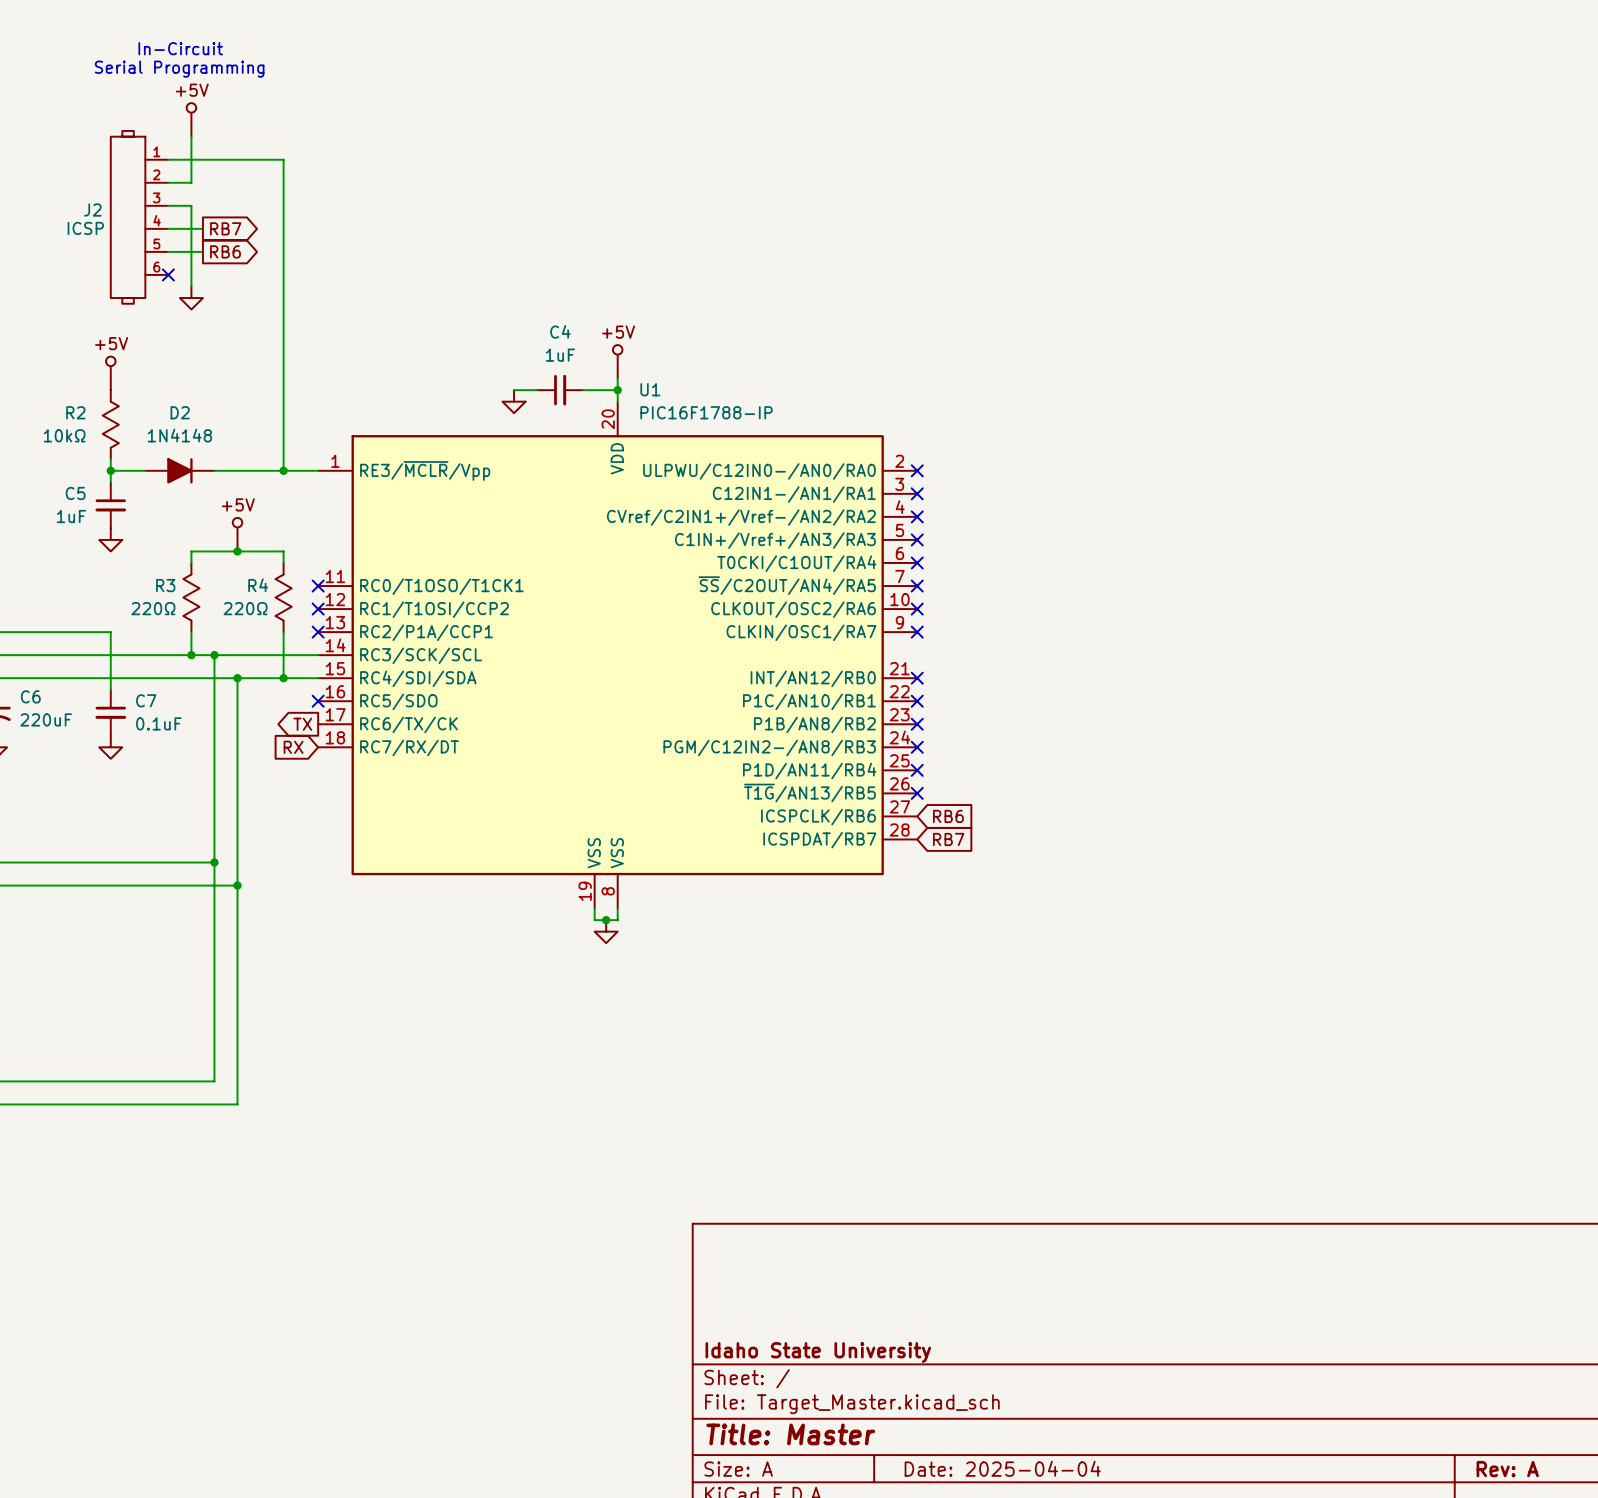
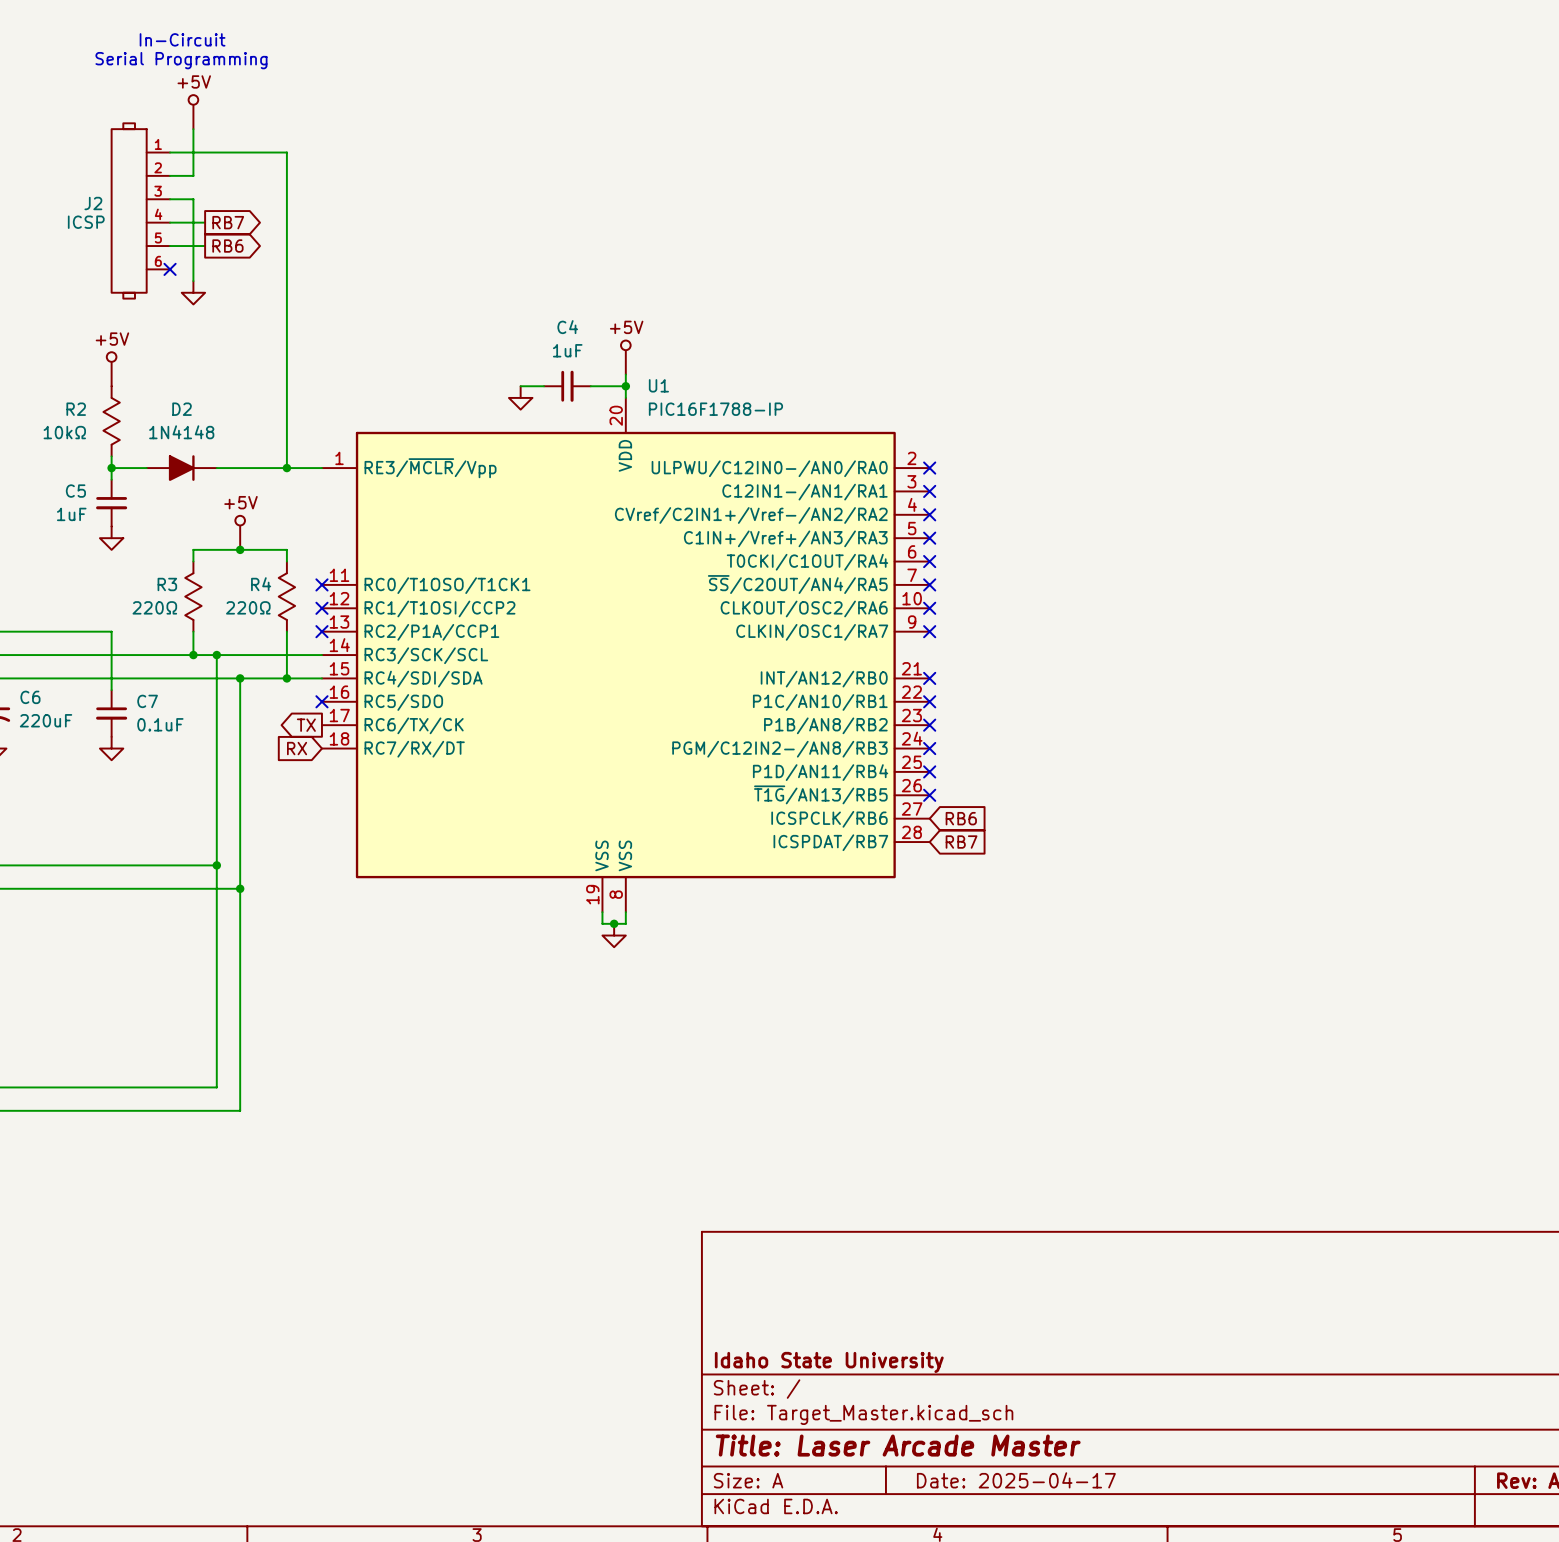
title block: Title: Master (790, 1434) -> Title: Laser Arcade Master (898, 1445)
title block: Date: 2025-04-04 (1002, 1468) -> Date: 2025-04-17 (1016, 1480)

